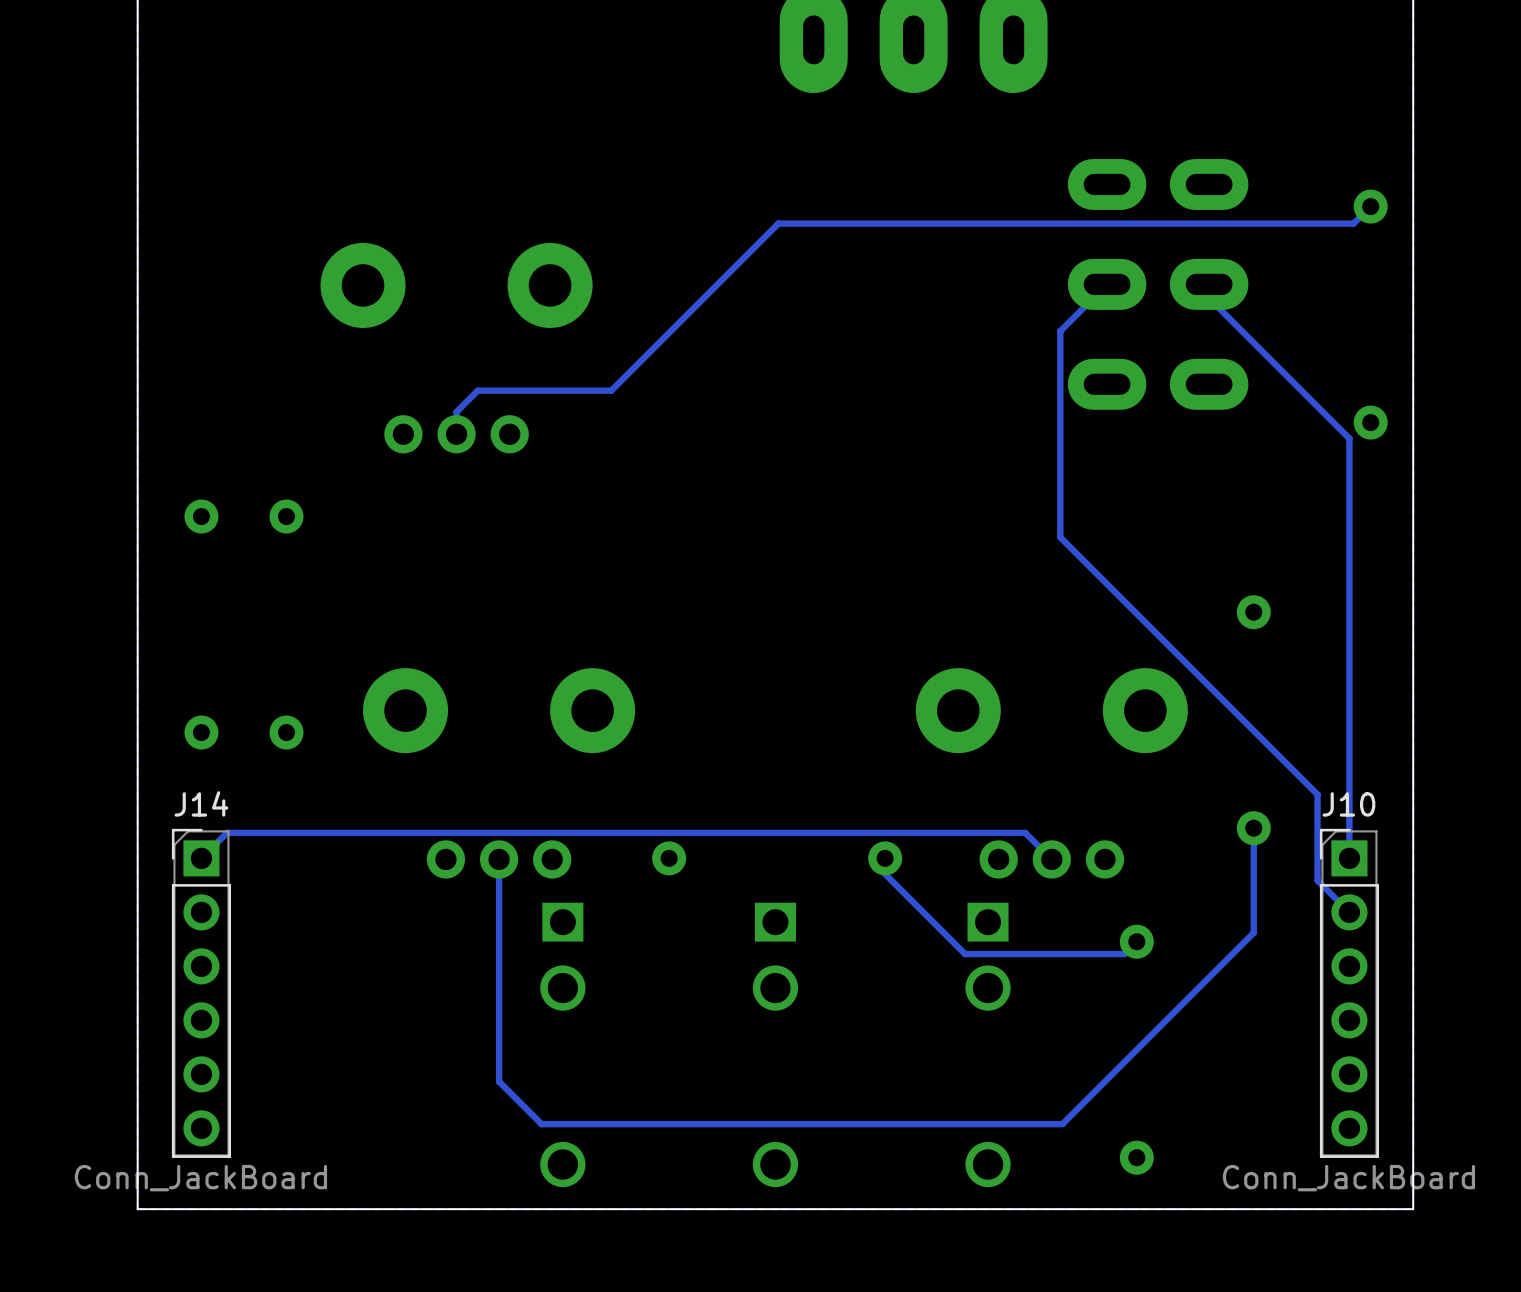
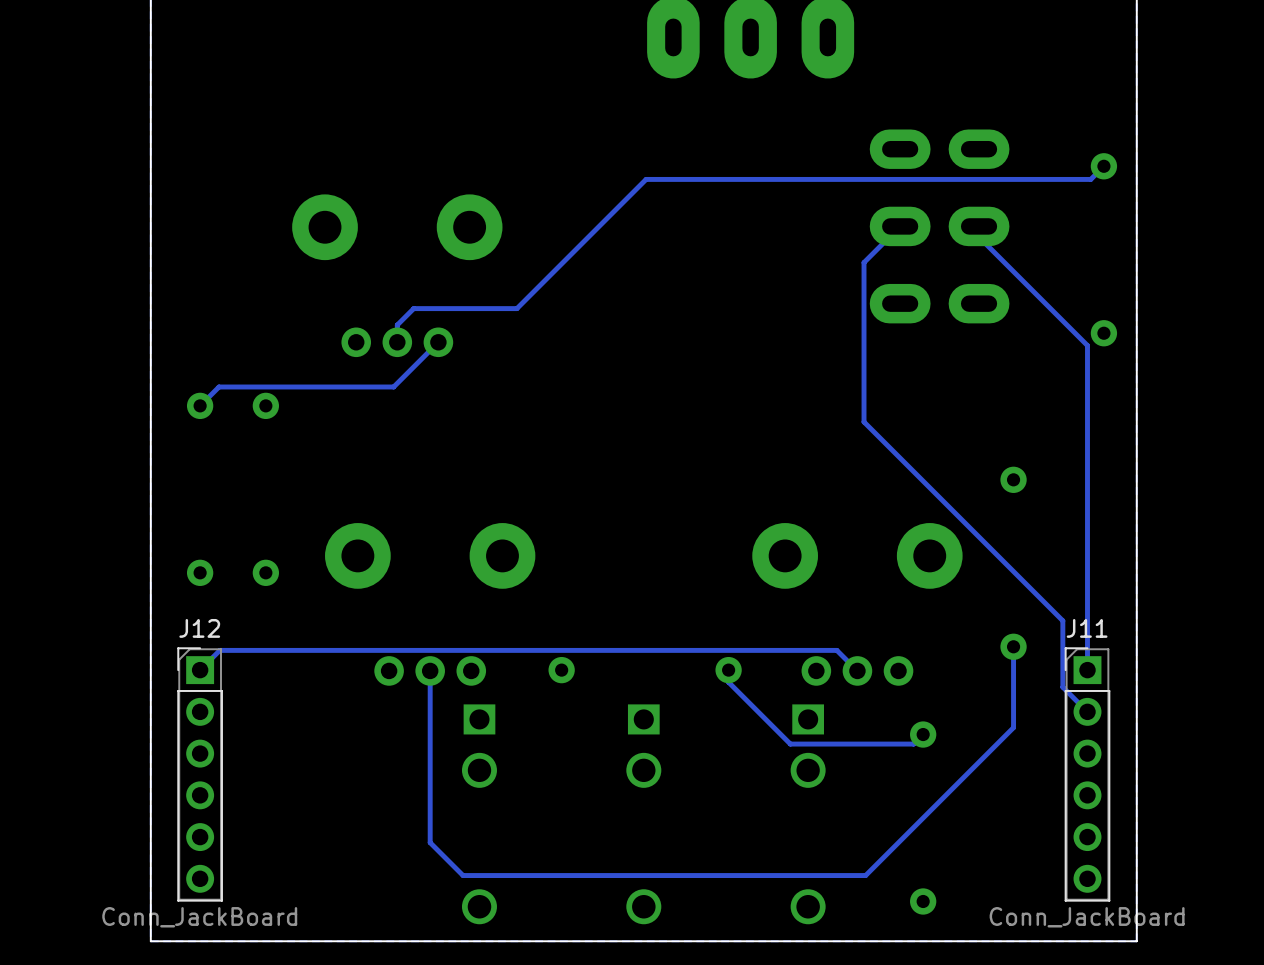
track: none -> (438, 342) (393, 386) (219, 386) (200, 405)
J14 name: J14 (201, 803) -> J12 (199, 628)
J10 name: J10 (1348, 804) -> J11 (1087, 628)

